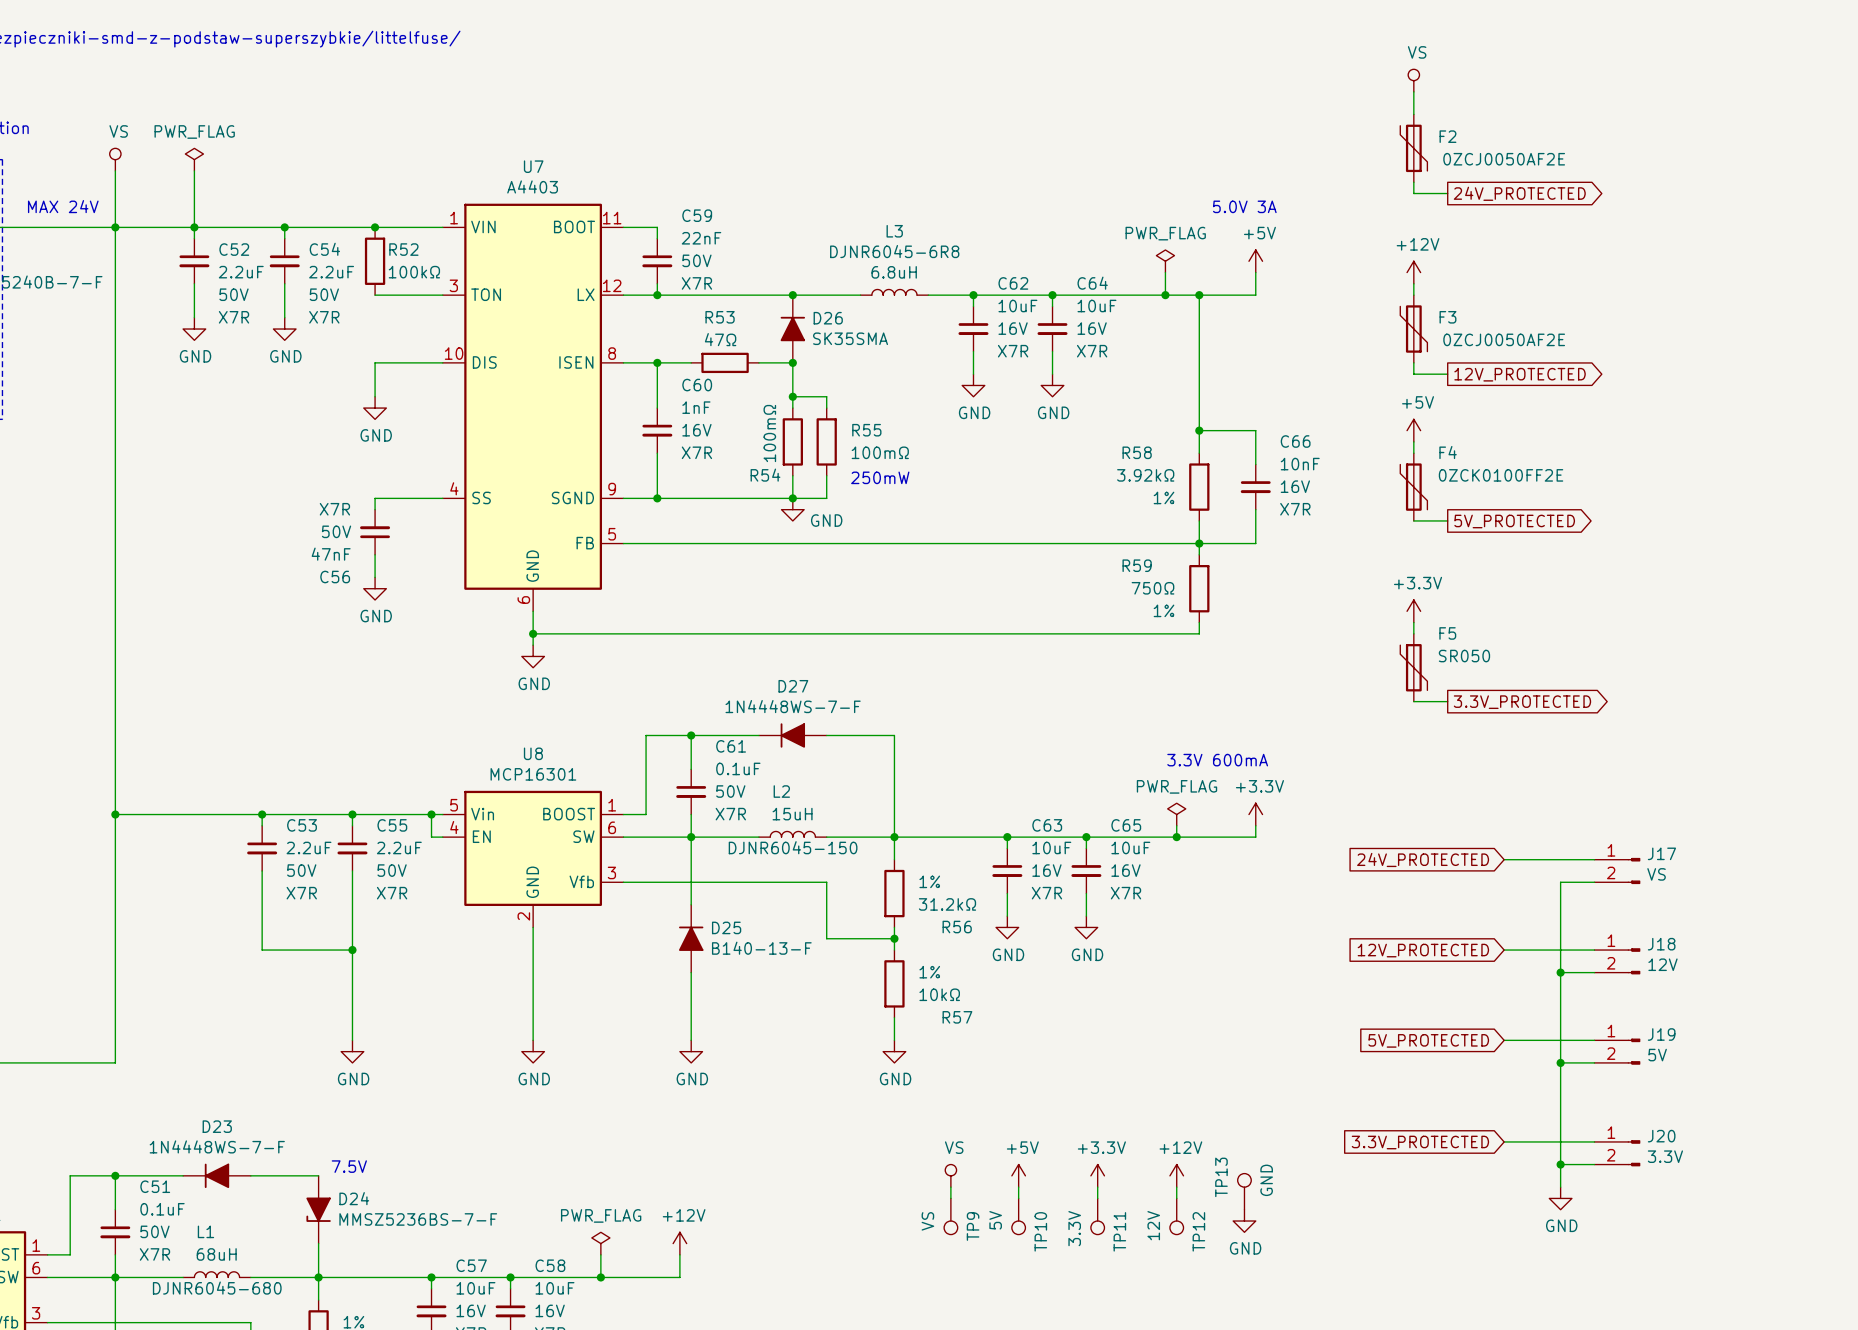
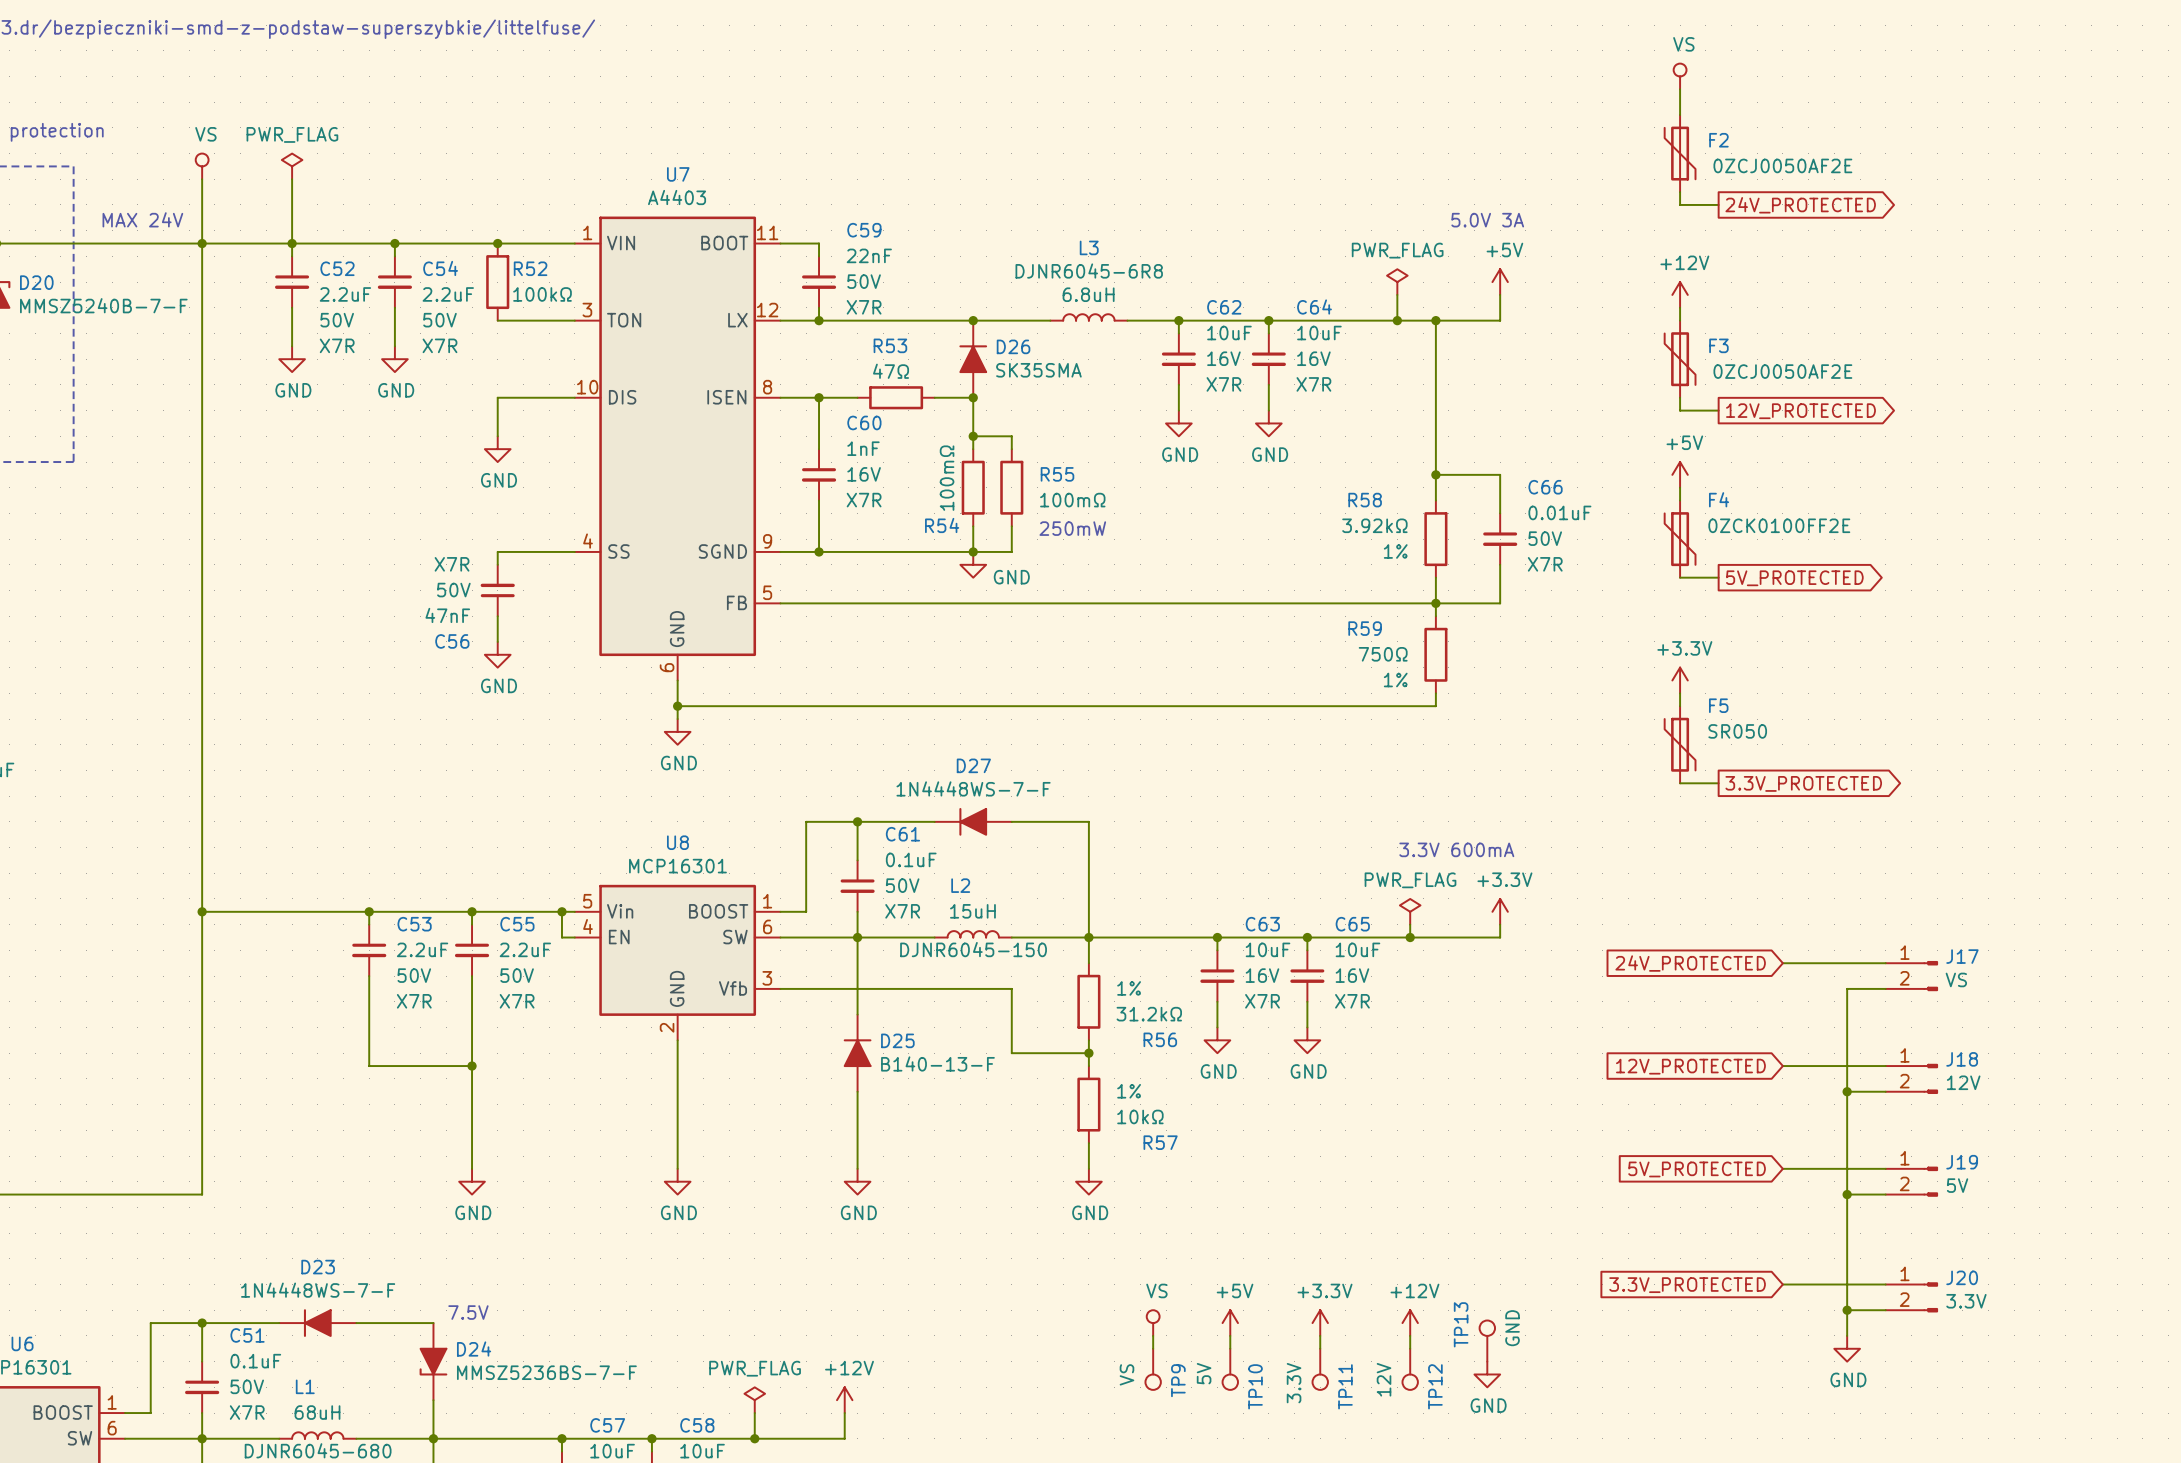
C66 value: 10nF (1300, 464) -> 0.01uF (1559, 512)
C66 text: 16V (1295, 486) -> 50V (1545, 538)

